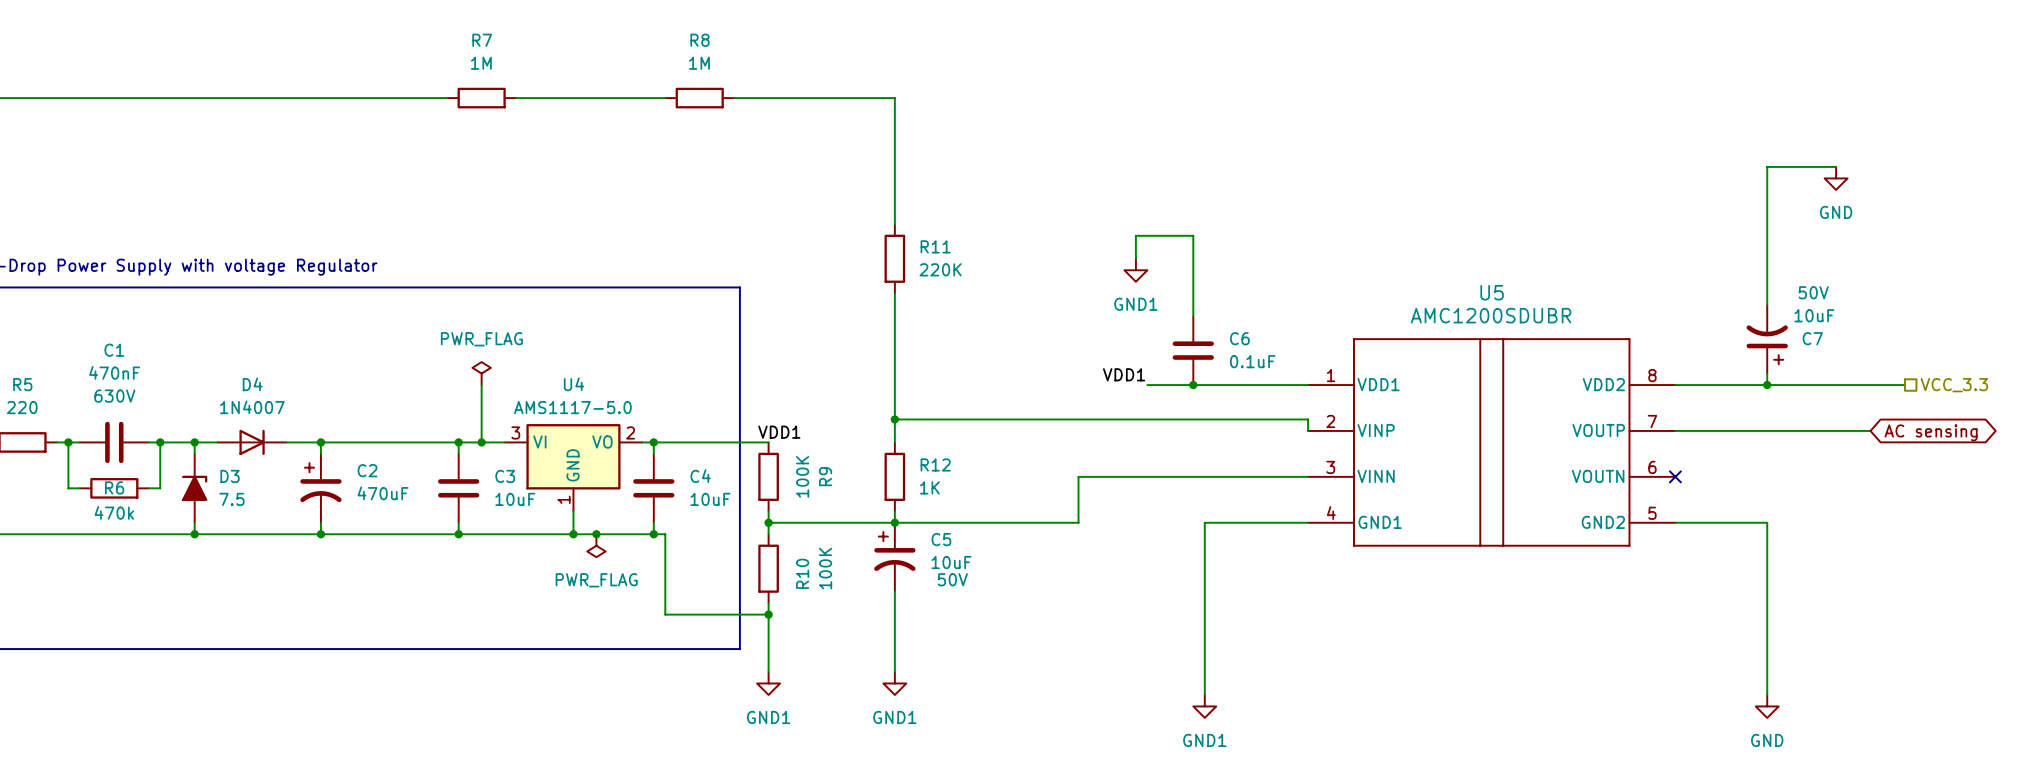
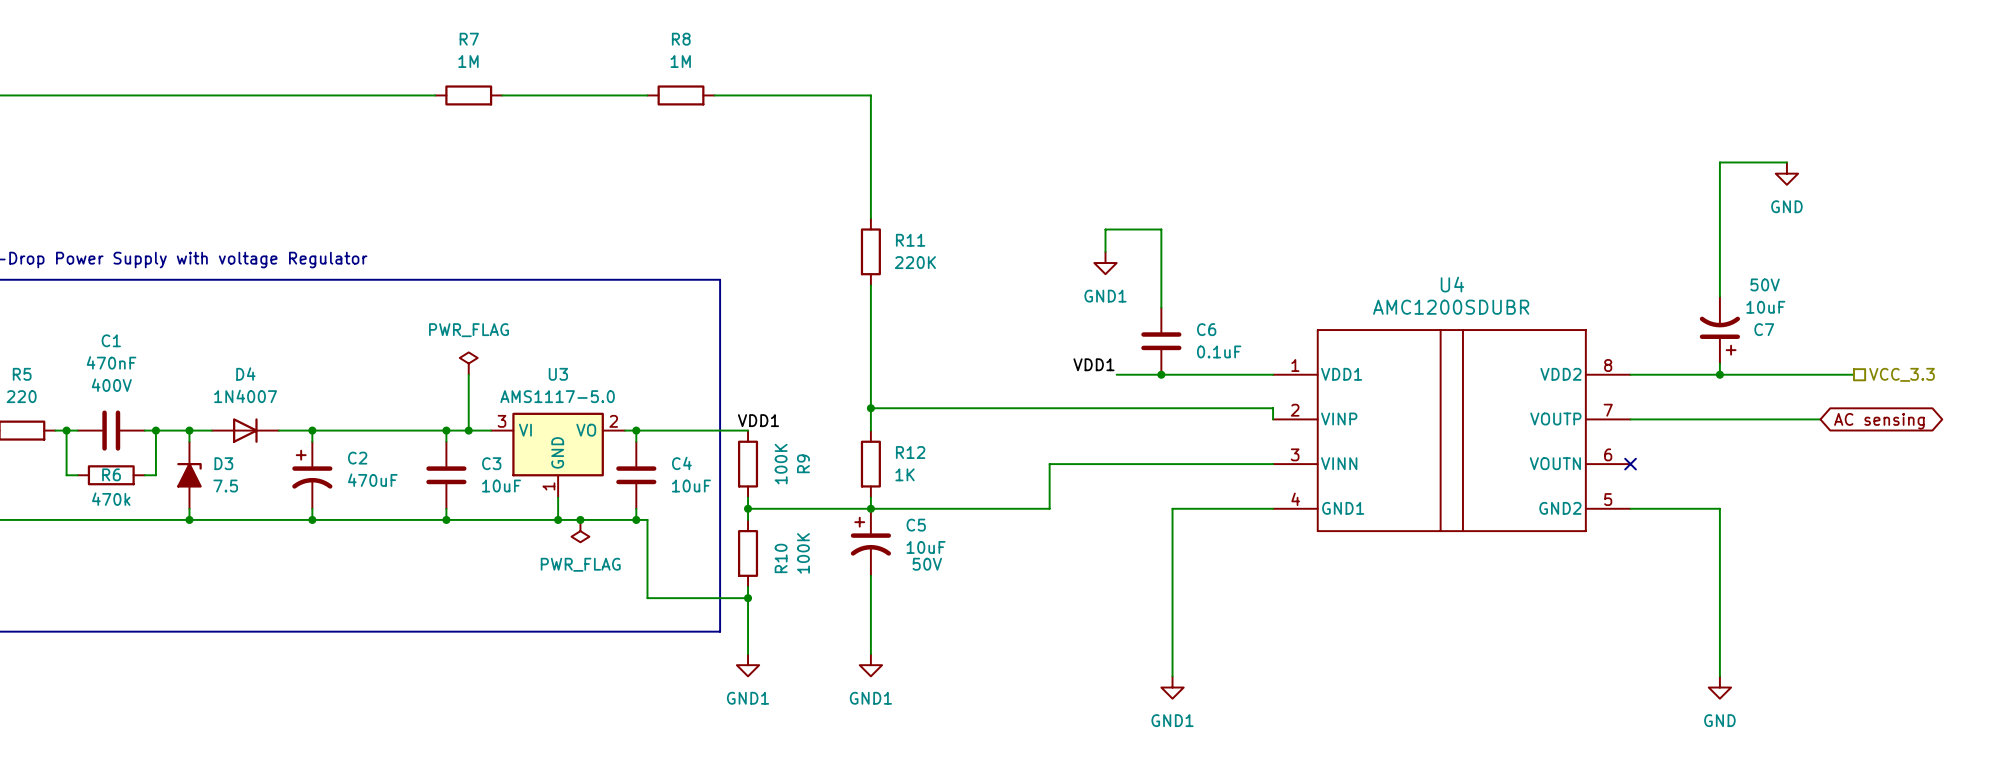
U5 name: U5 (1492, 292) -> U4 (1452, 284)
U4 name: U4 (574, 384) -> U3 (558, 374)
C1 text: 630V (114, 396) -> 400V (111, 385)

